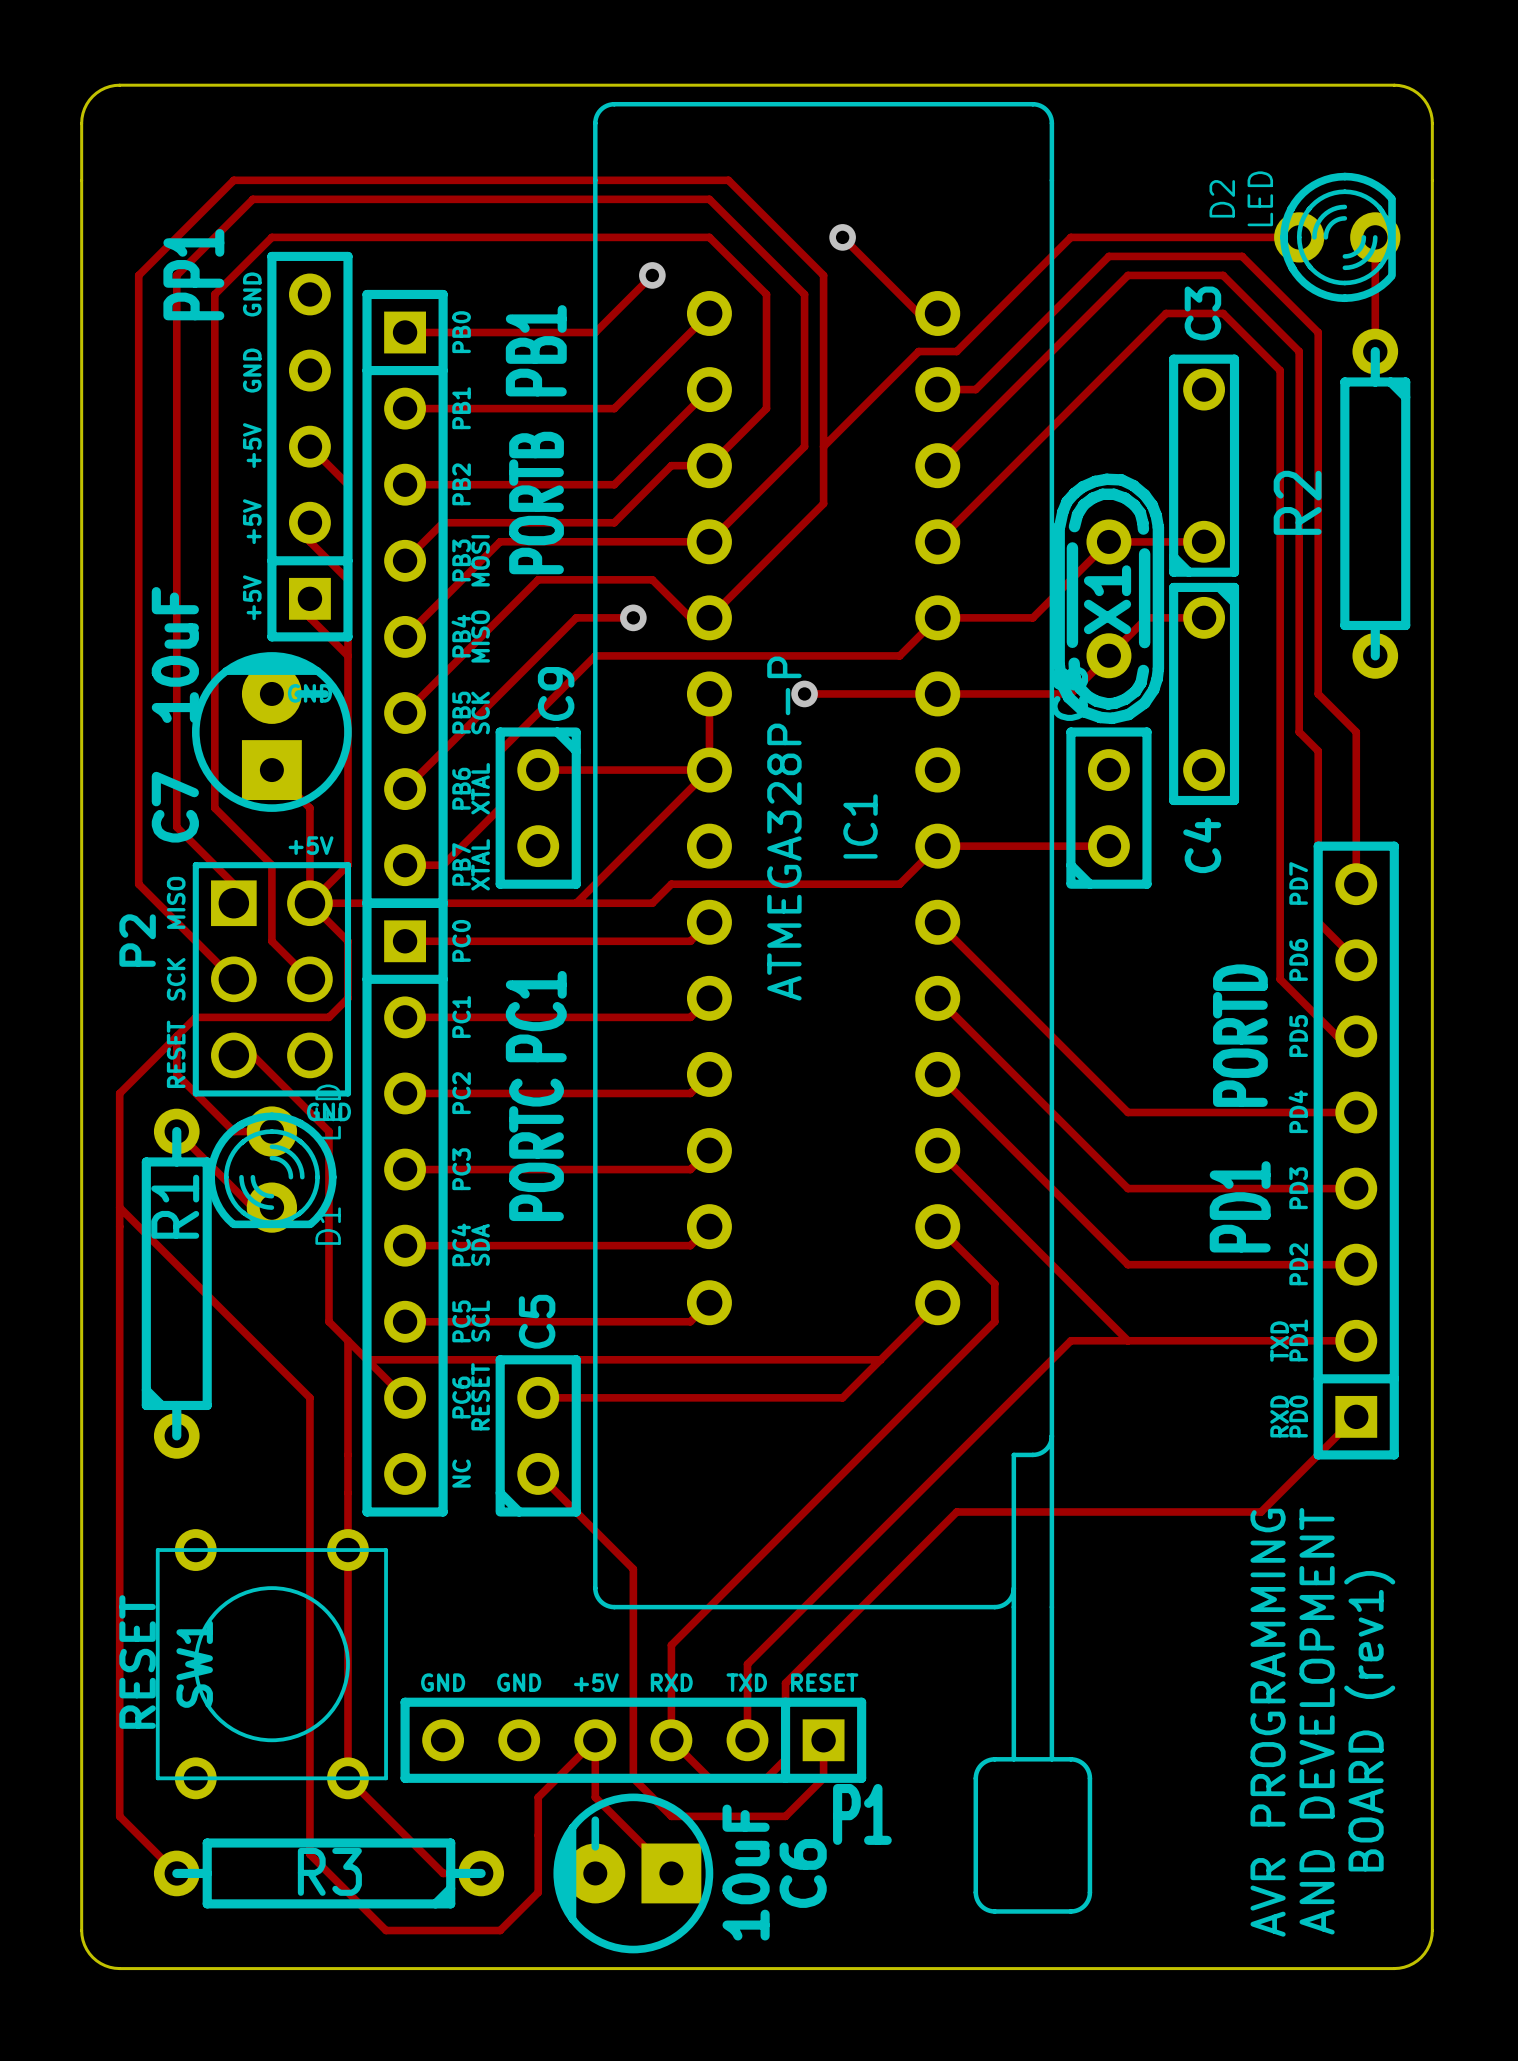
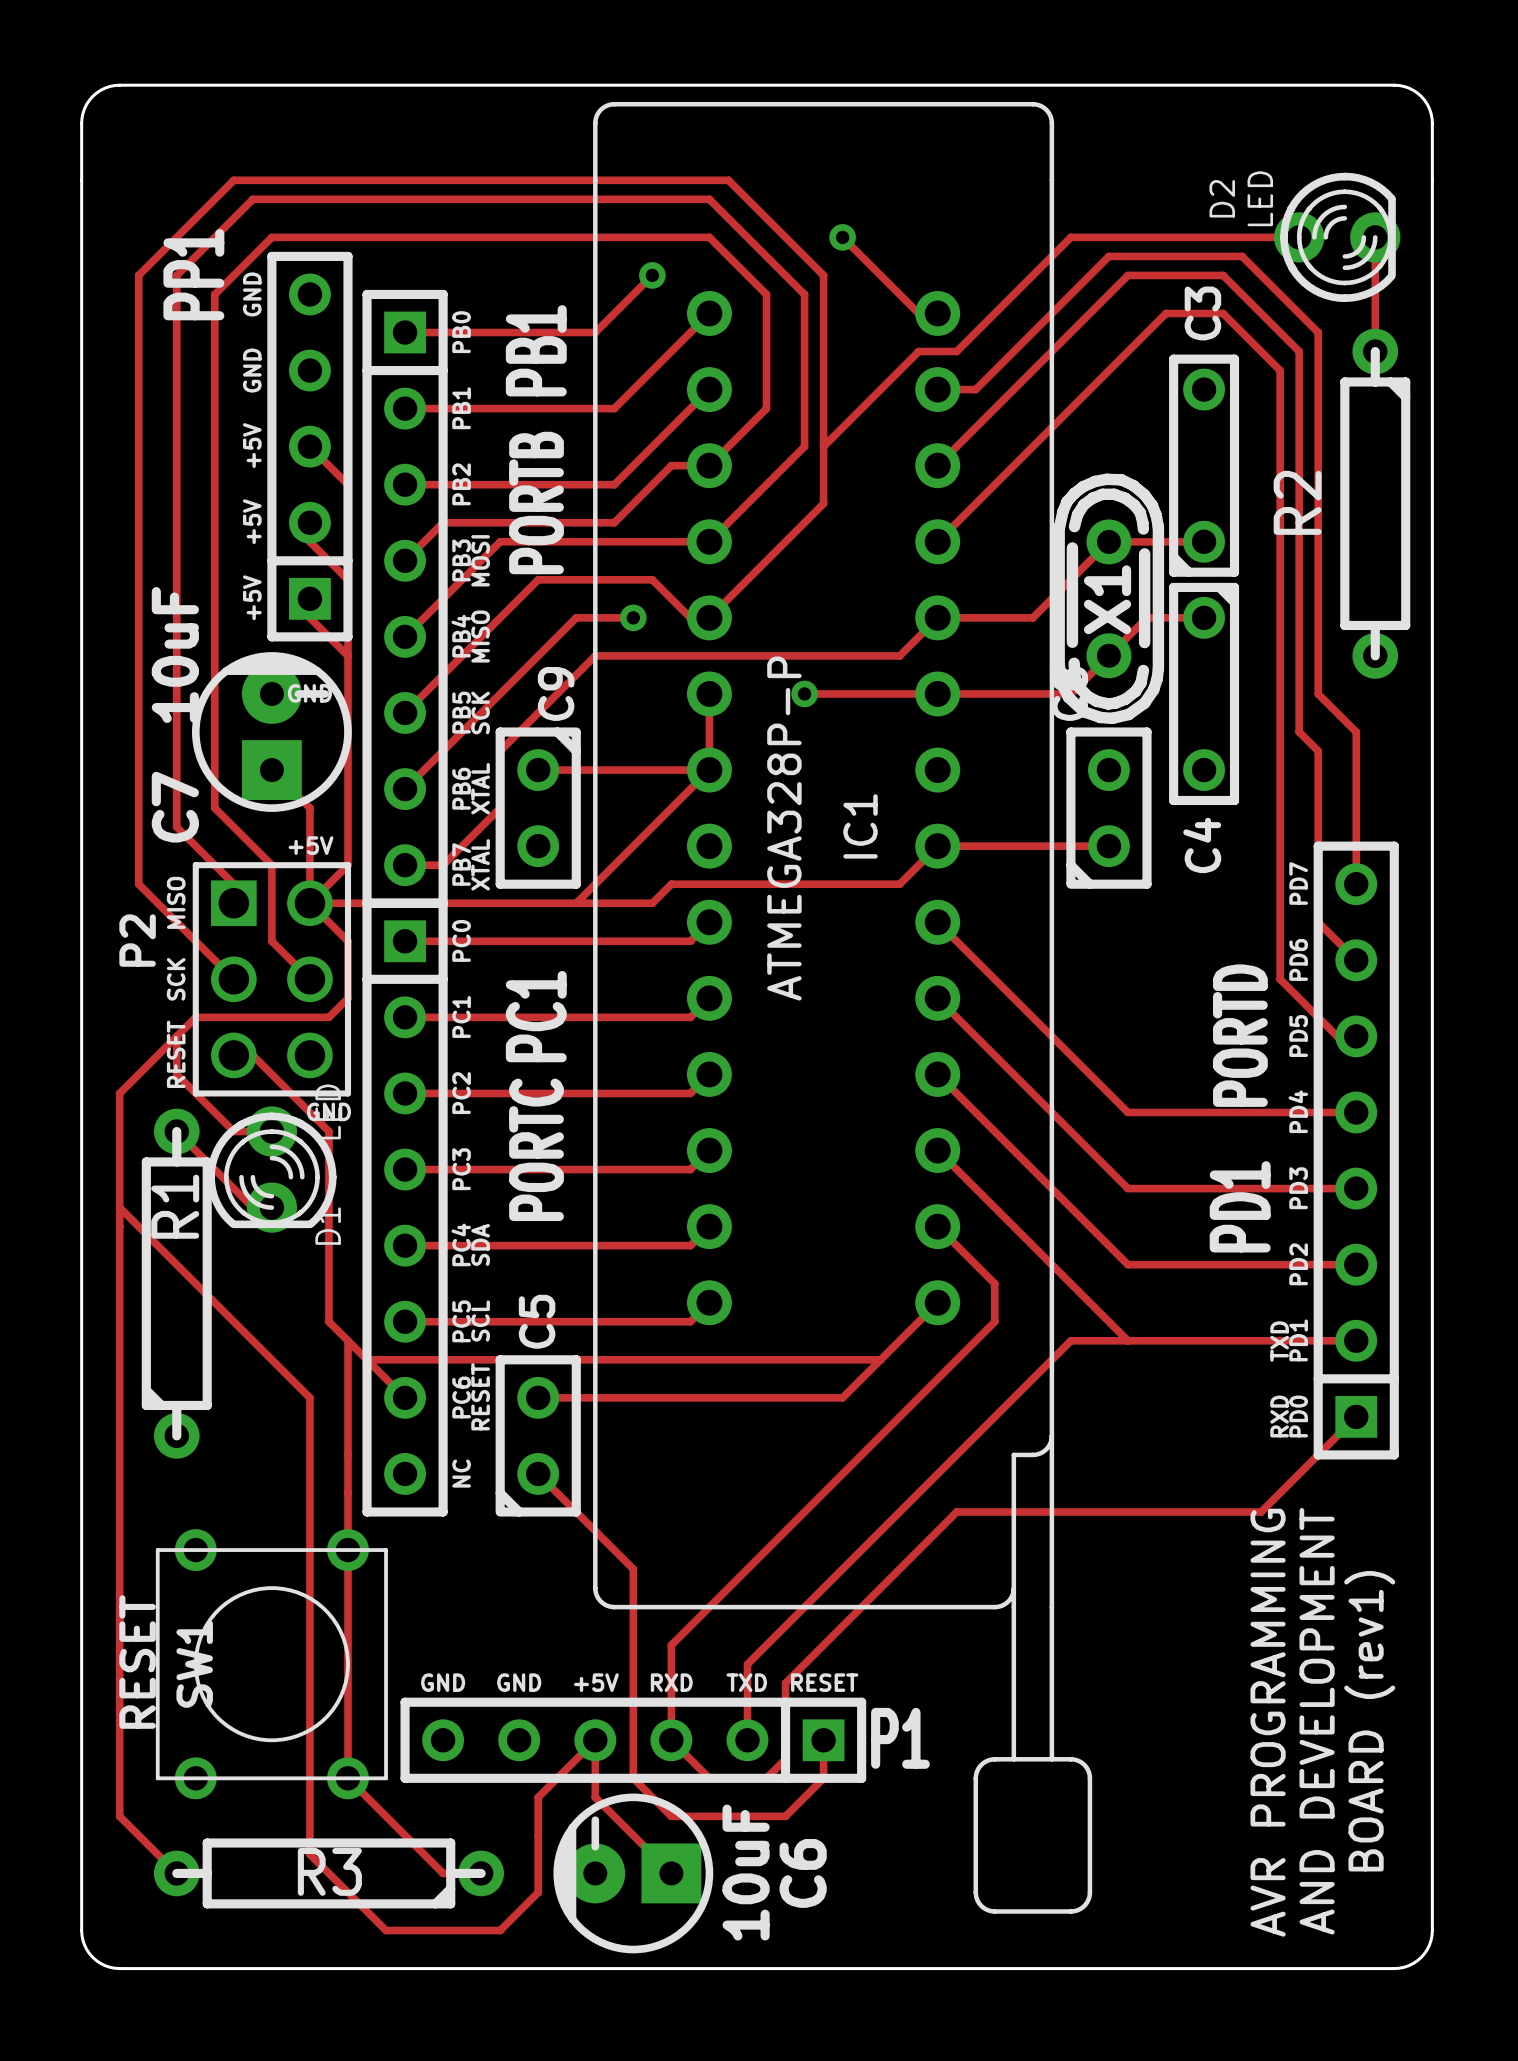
P1 name position: P1 (862, 1814) -> P1 (900, 1738)

